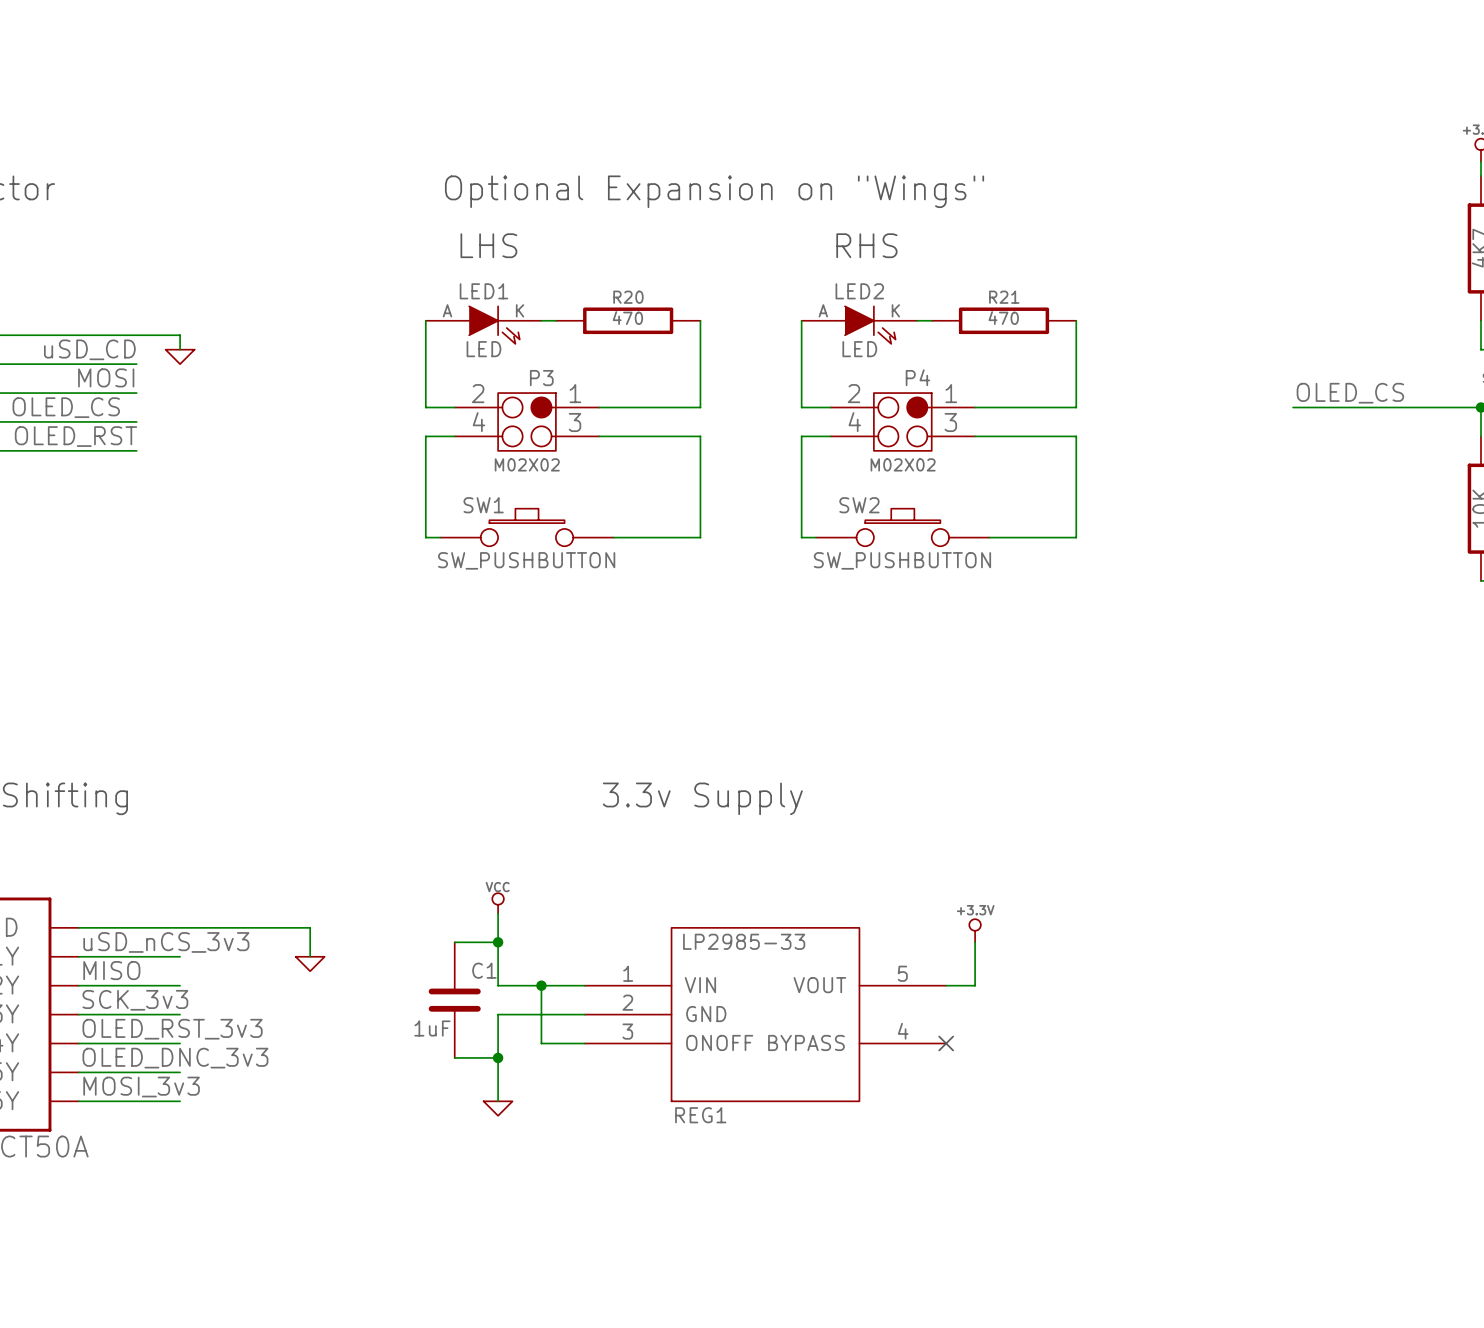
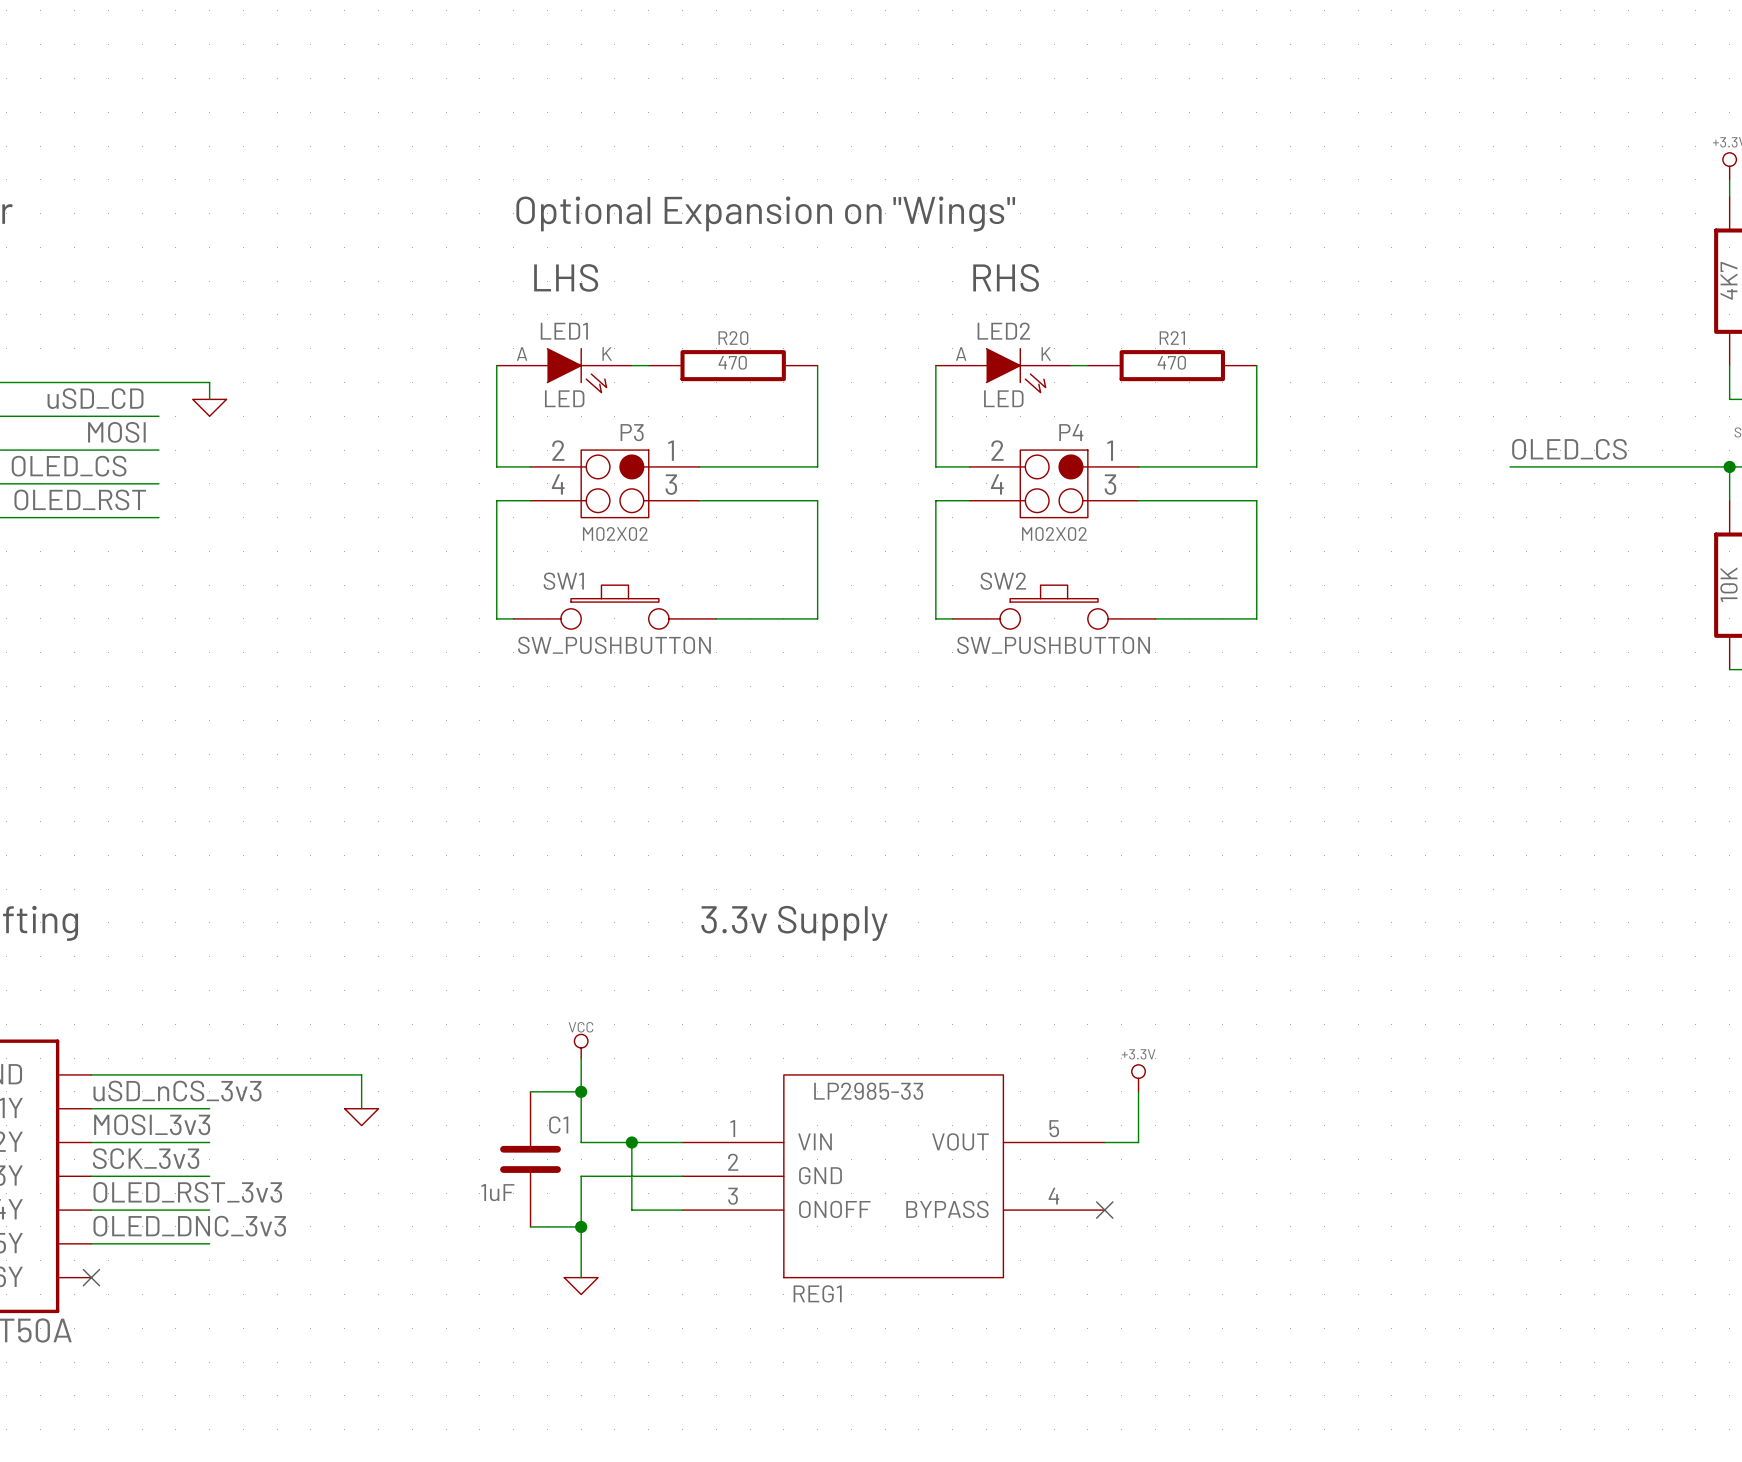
label: MISO (111, 970) -> MOSI_3v3 (152, 1124)
label: MOSI_3v3 (141, 1087) -> none
wire: (78, 1101) (180, 1101) -> none
no-connect mark: none -> (91, 1277)

